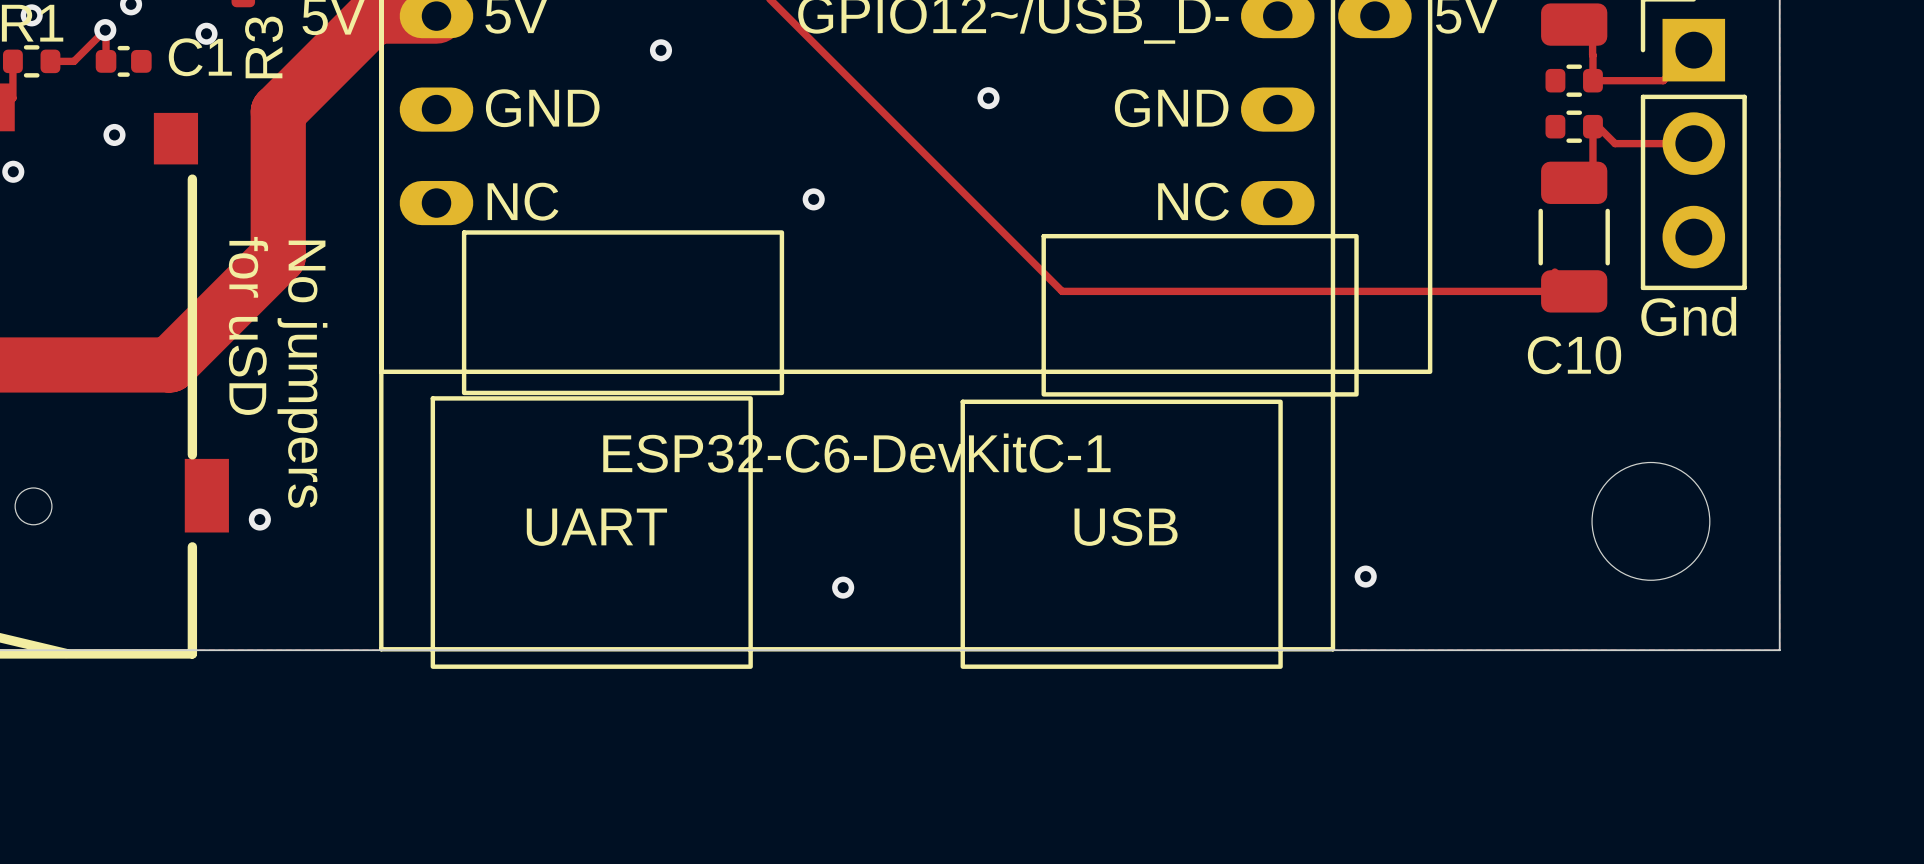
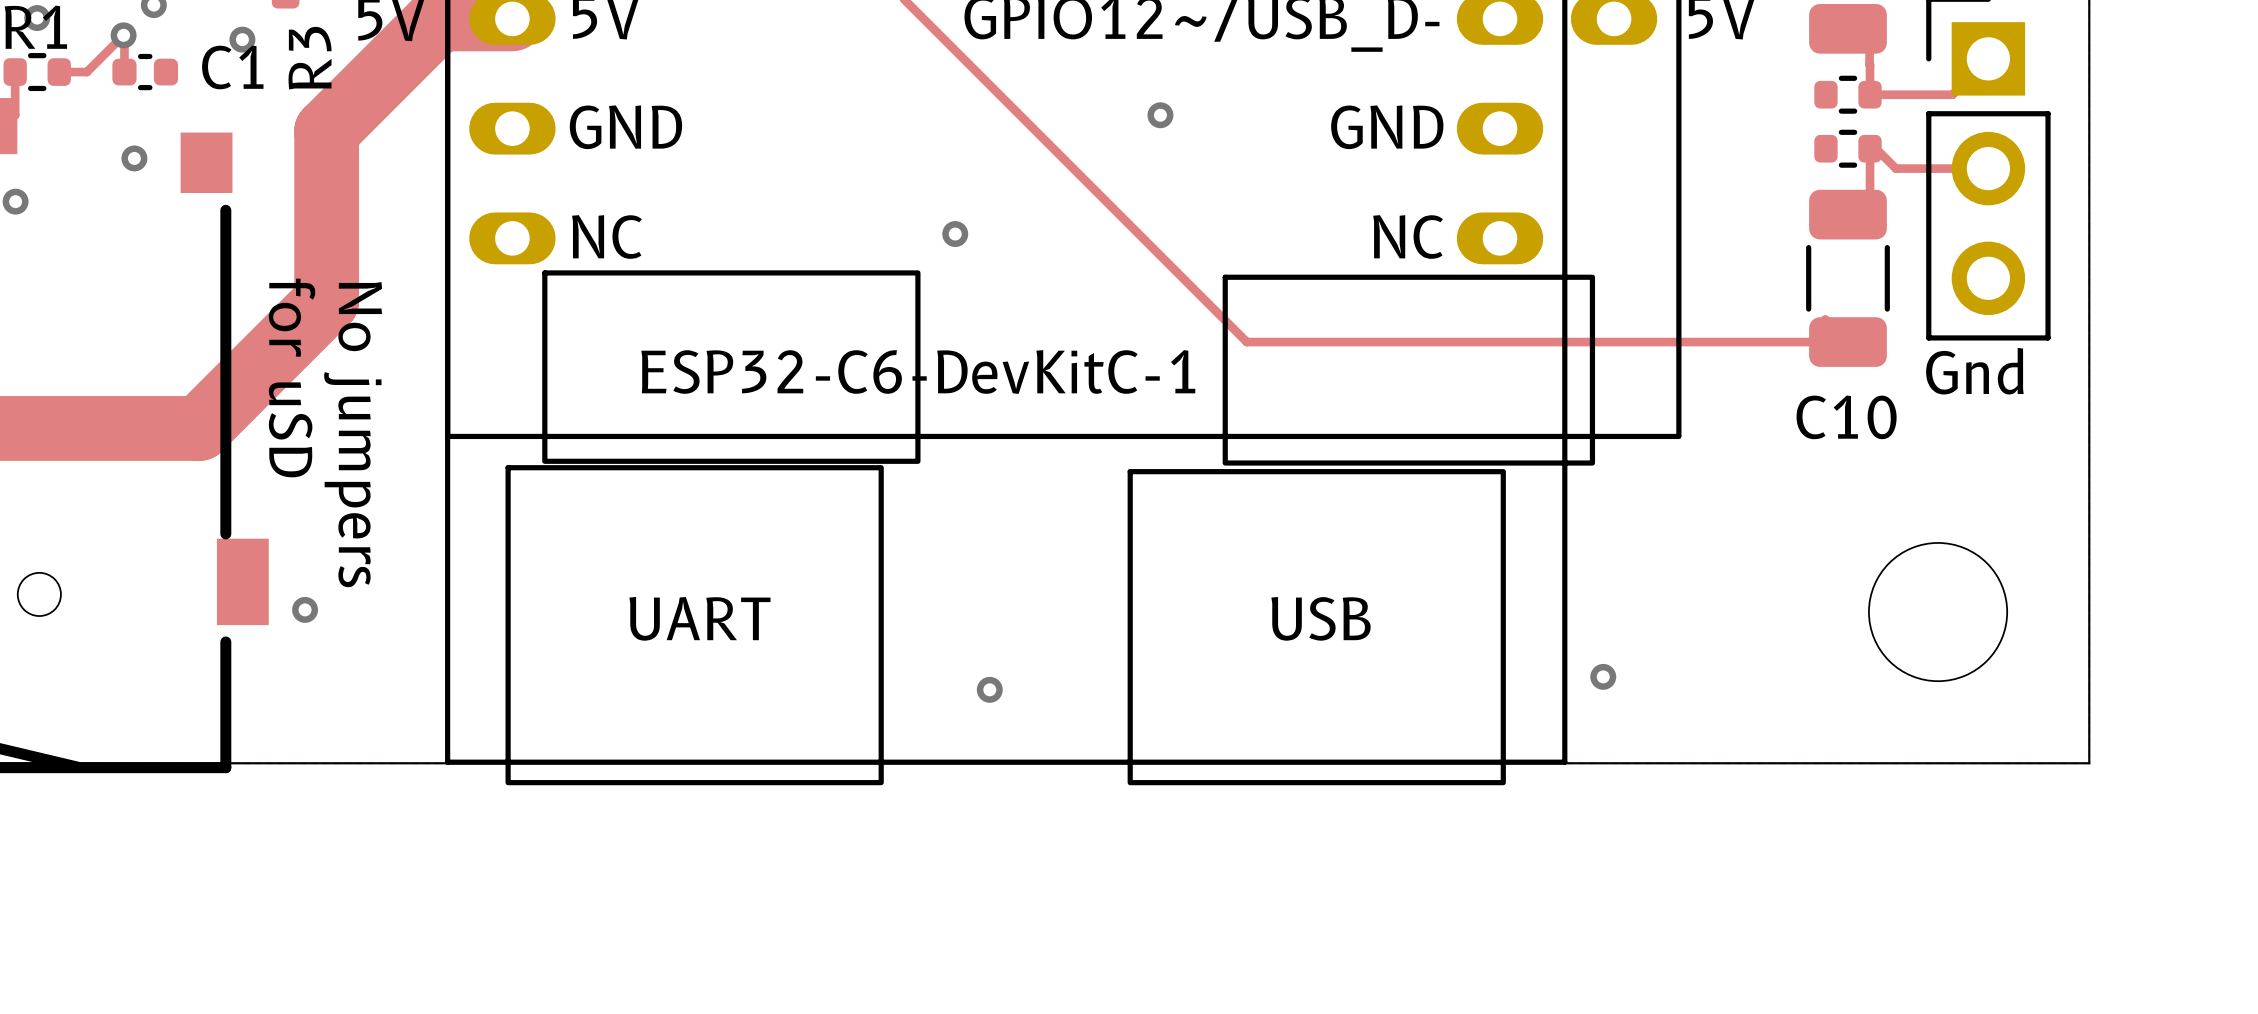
via: (660, 50) -> none
part value position: ESP32-C6-DevKitC-1 (856, 453) -> ESP32-C6-DevKitC-1 (918, 372)

